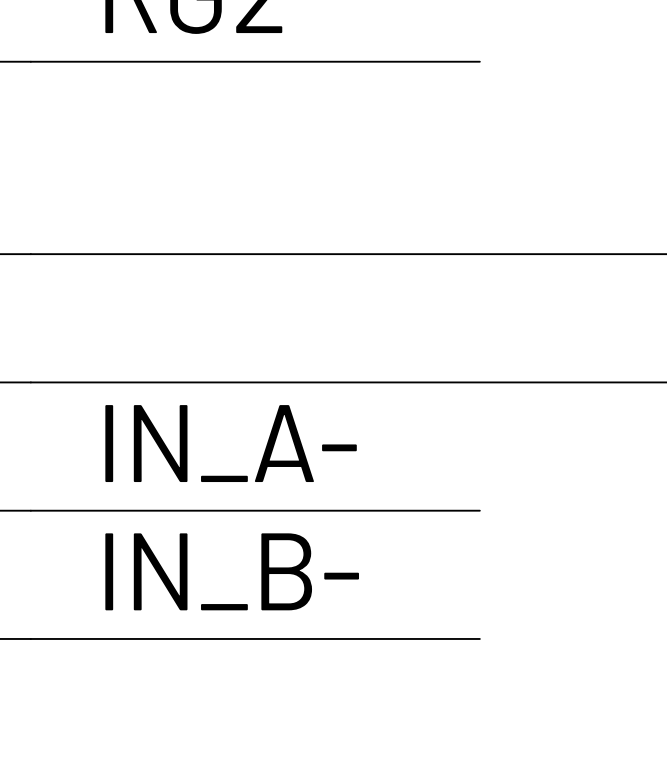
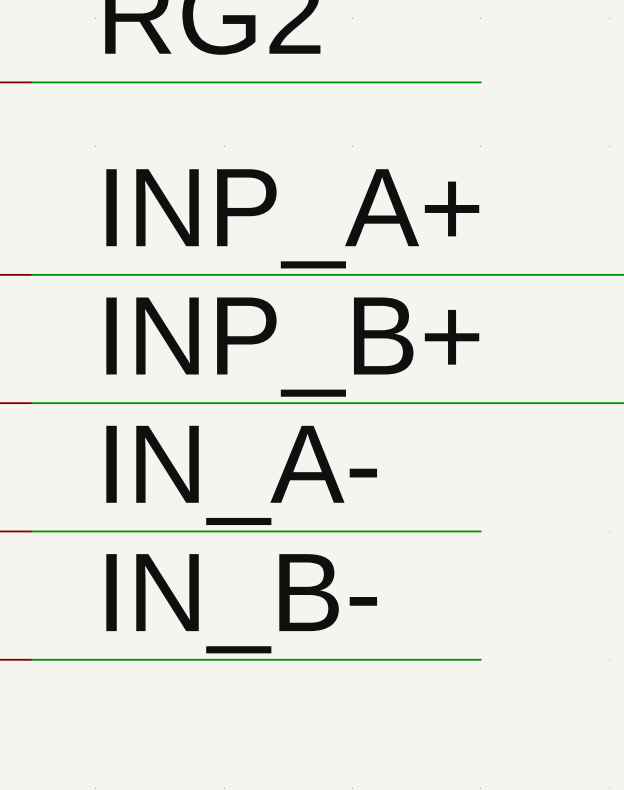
label: none -> INP_A+ (292, 218)
label: none -> INP_B+ (292, 347)

